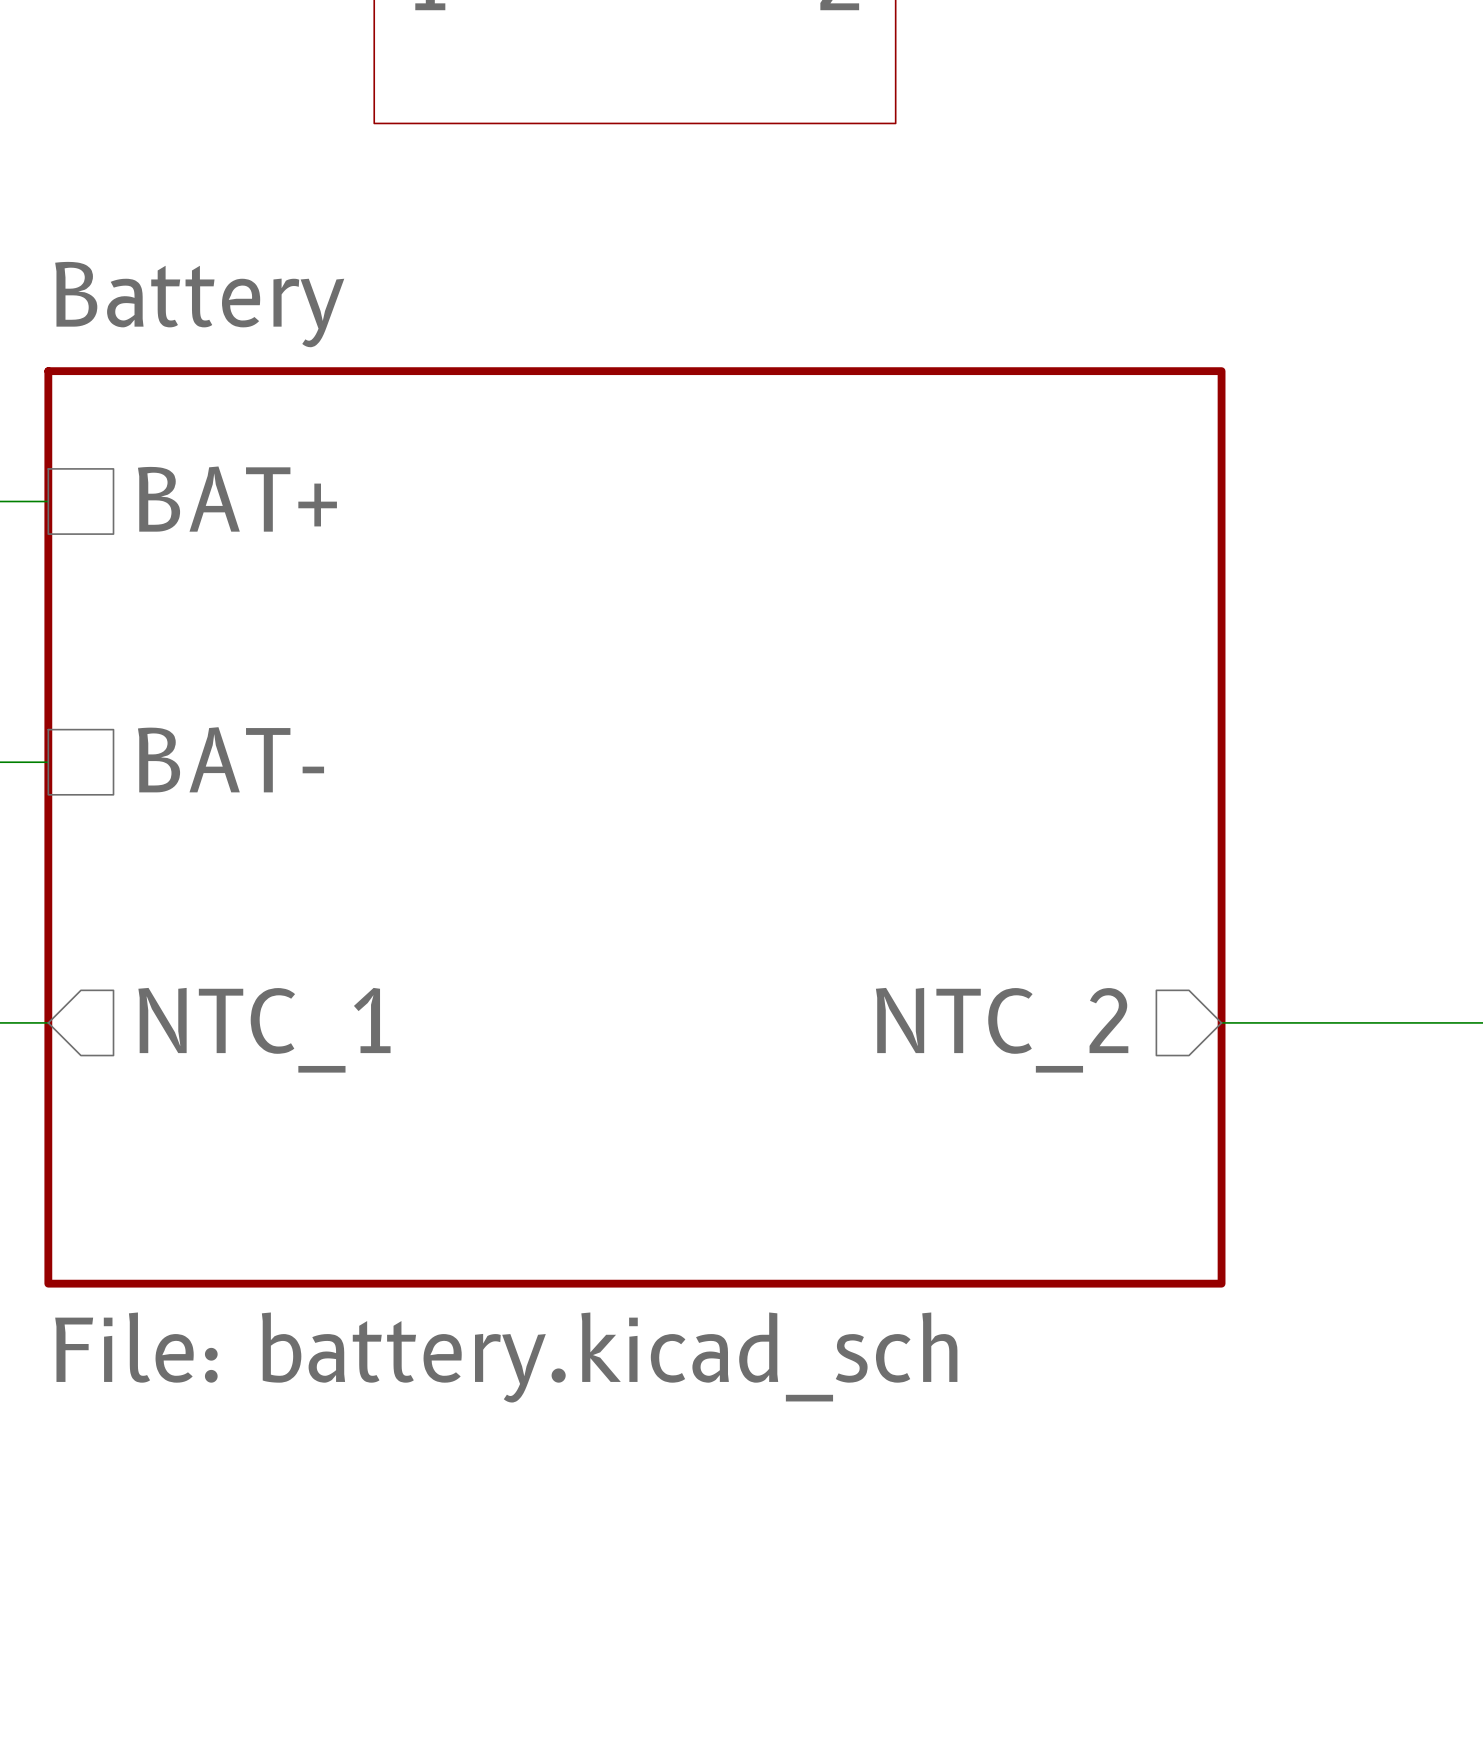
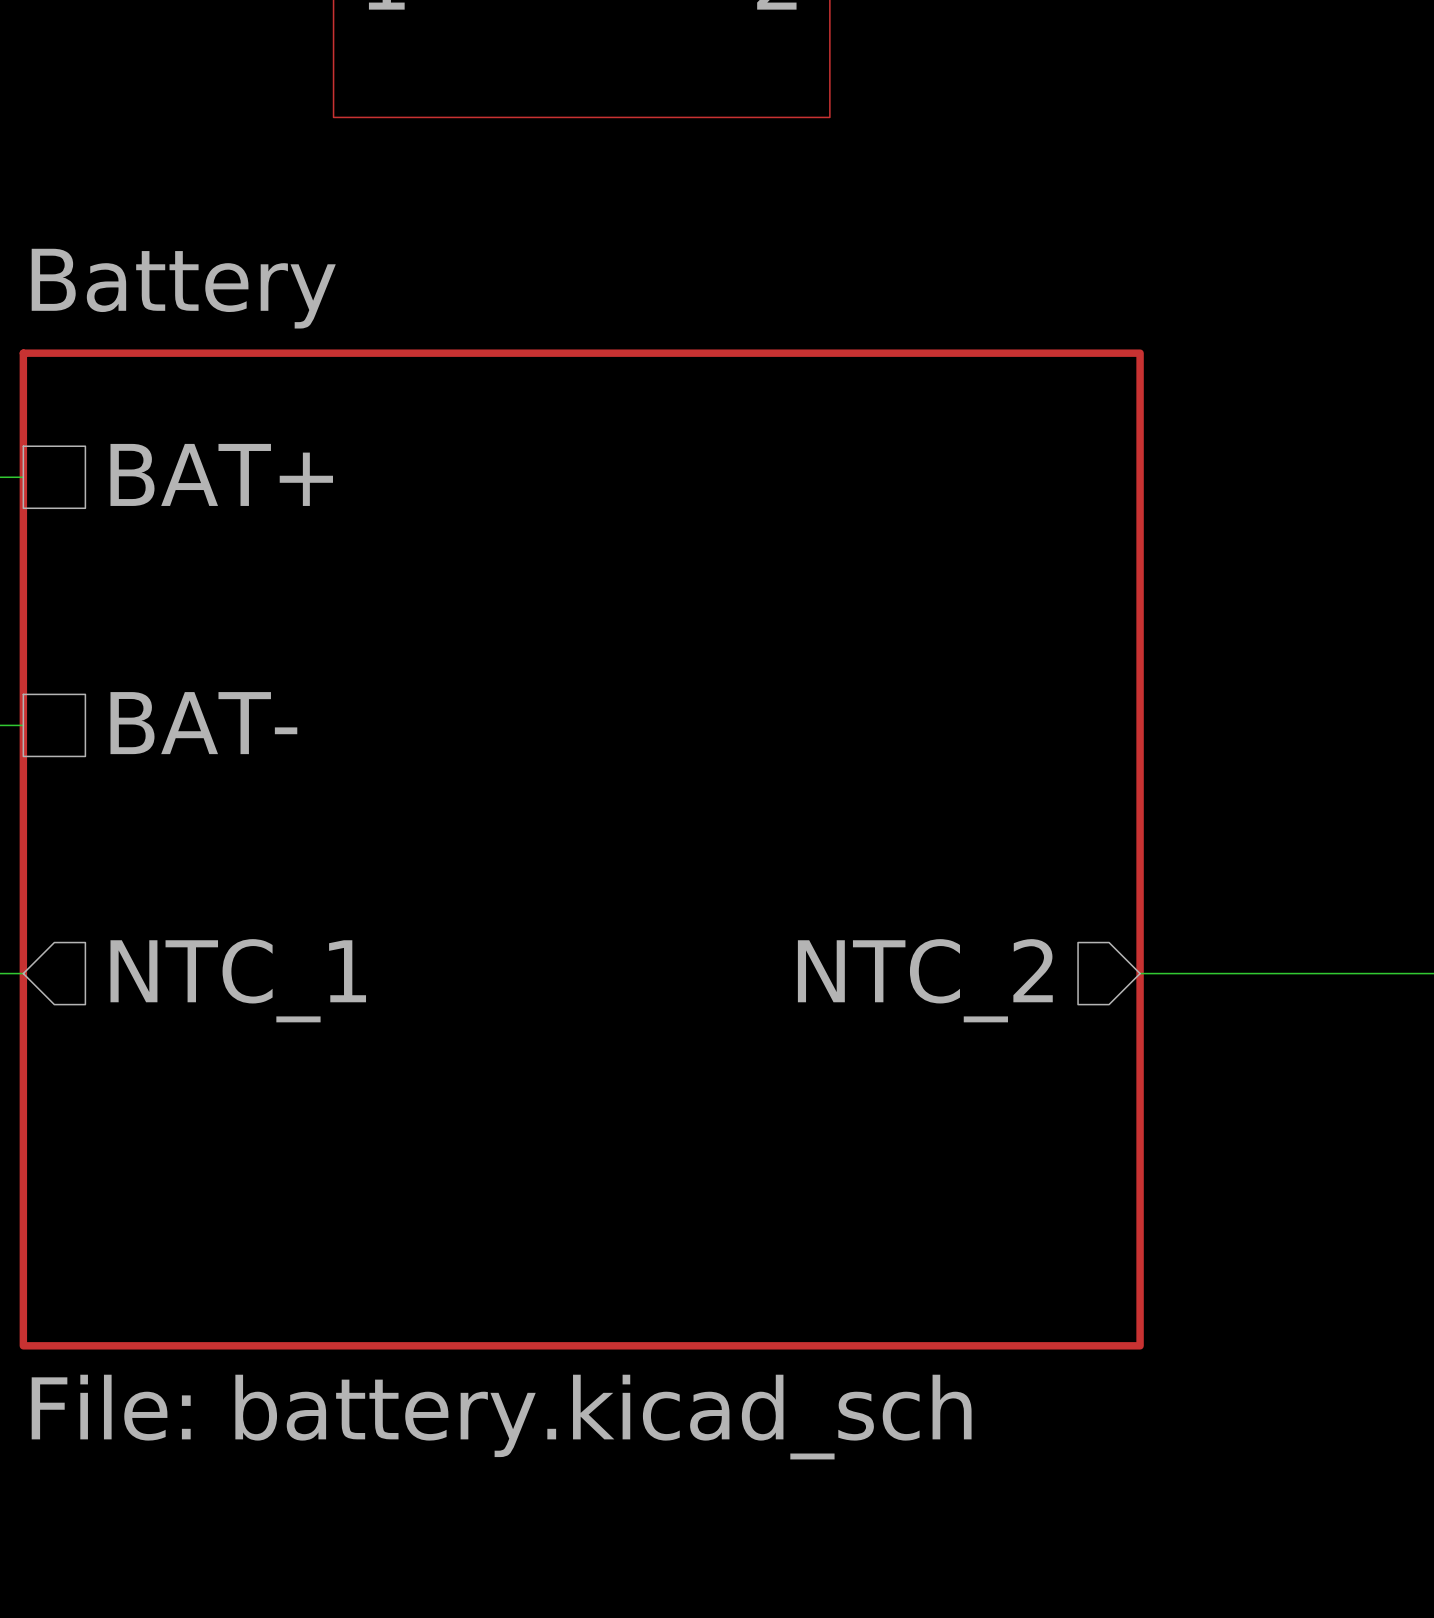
sheet Battery: File: battery.kicad_sch (634, 827) -> none
sheet Battery: none -> File: battery.kicad_sch (581, 849)

